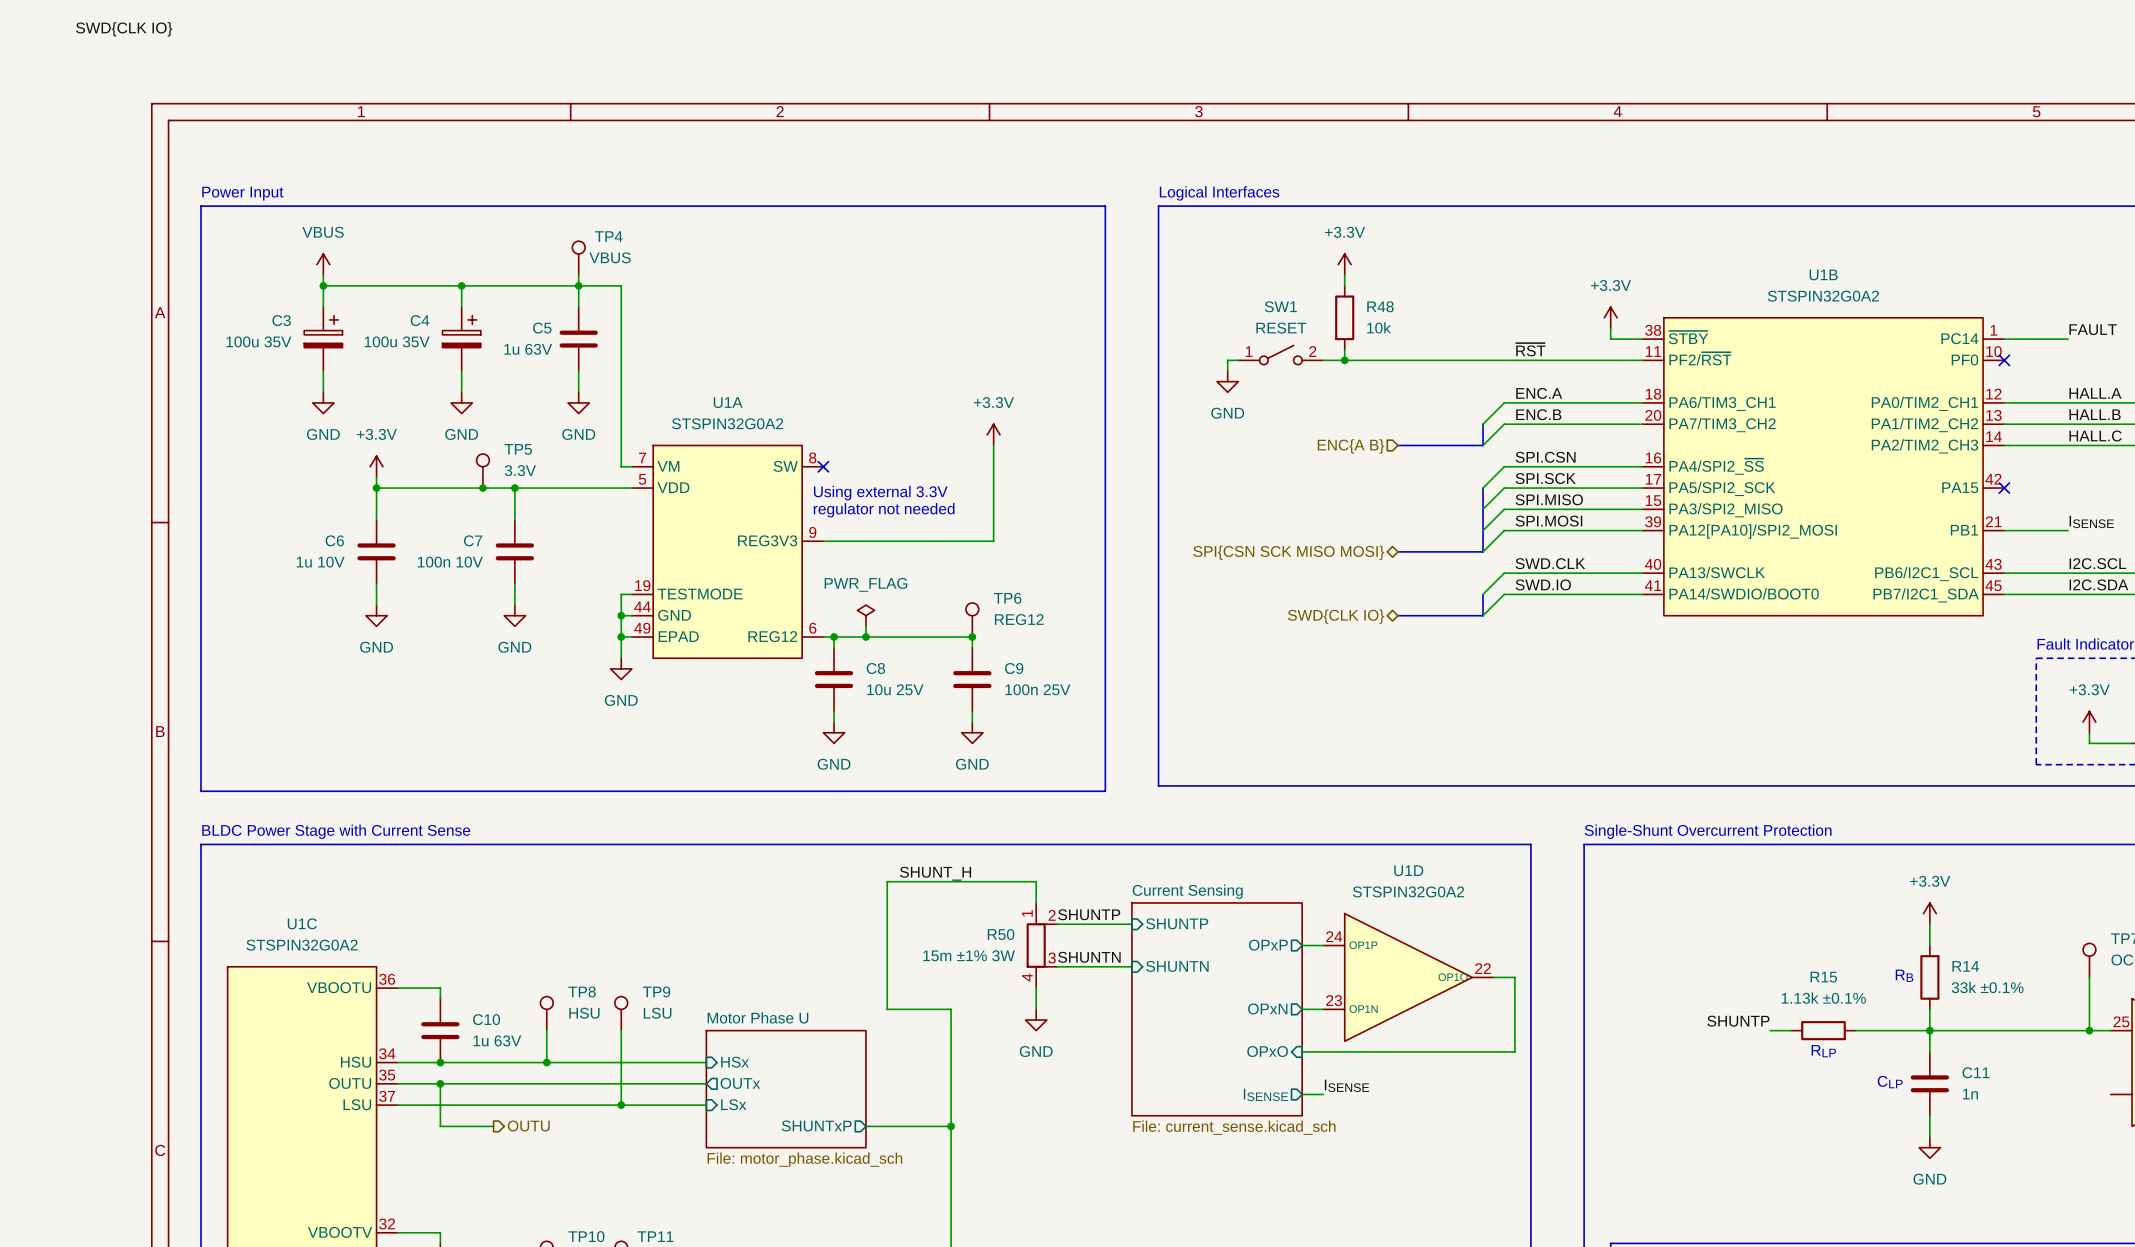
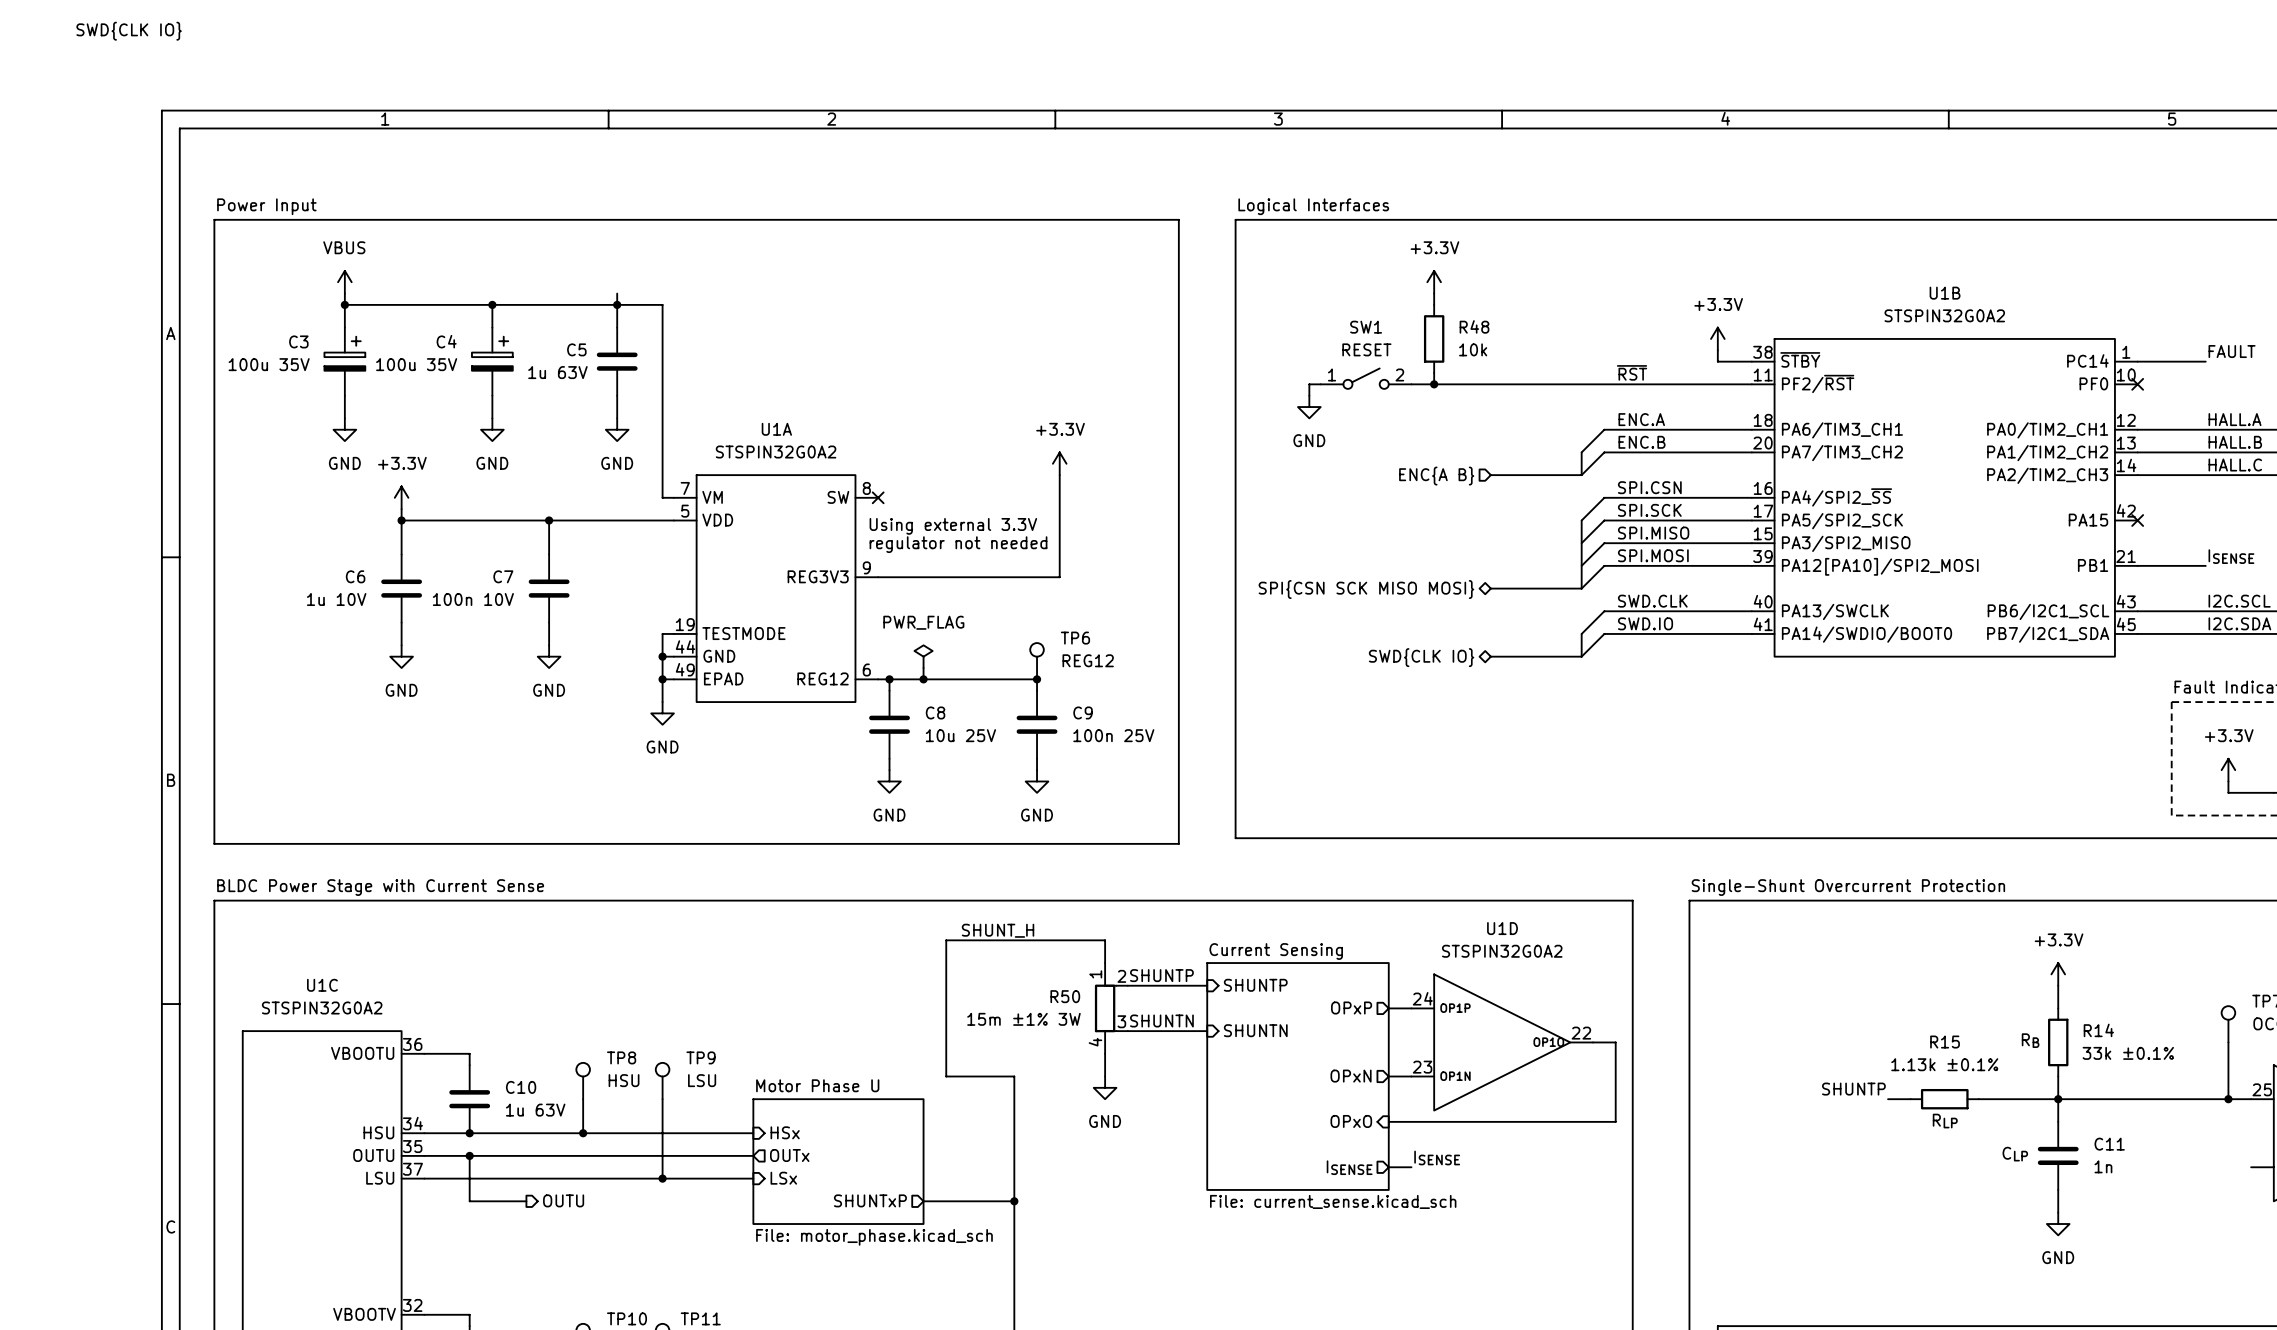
TP4: VBUS (578, 258) -> none
TP5: 3.3V (482, 471) -> none
junction: (482, 488) -> none

